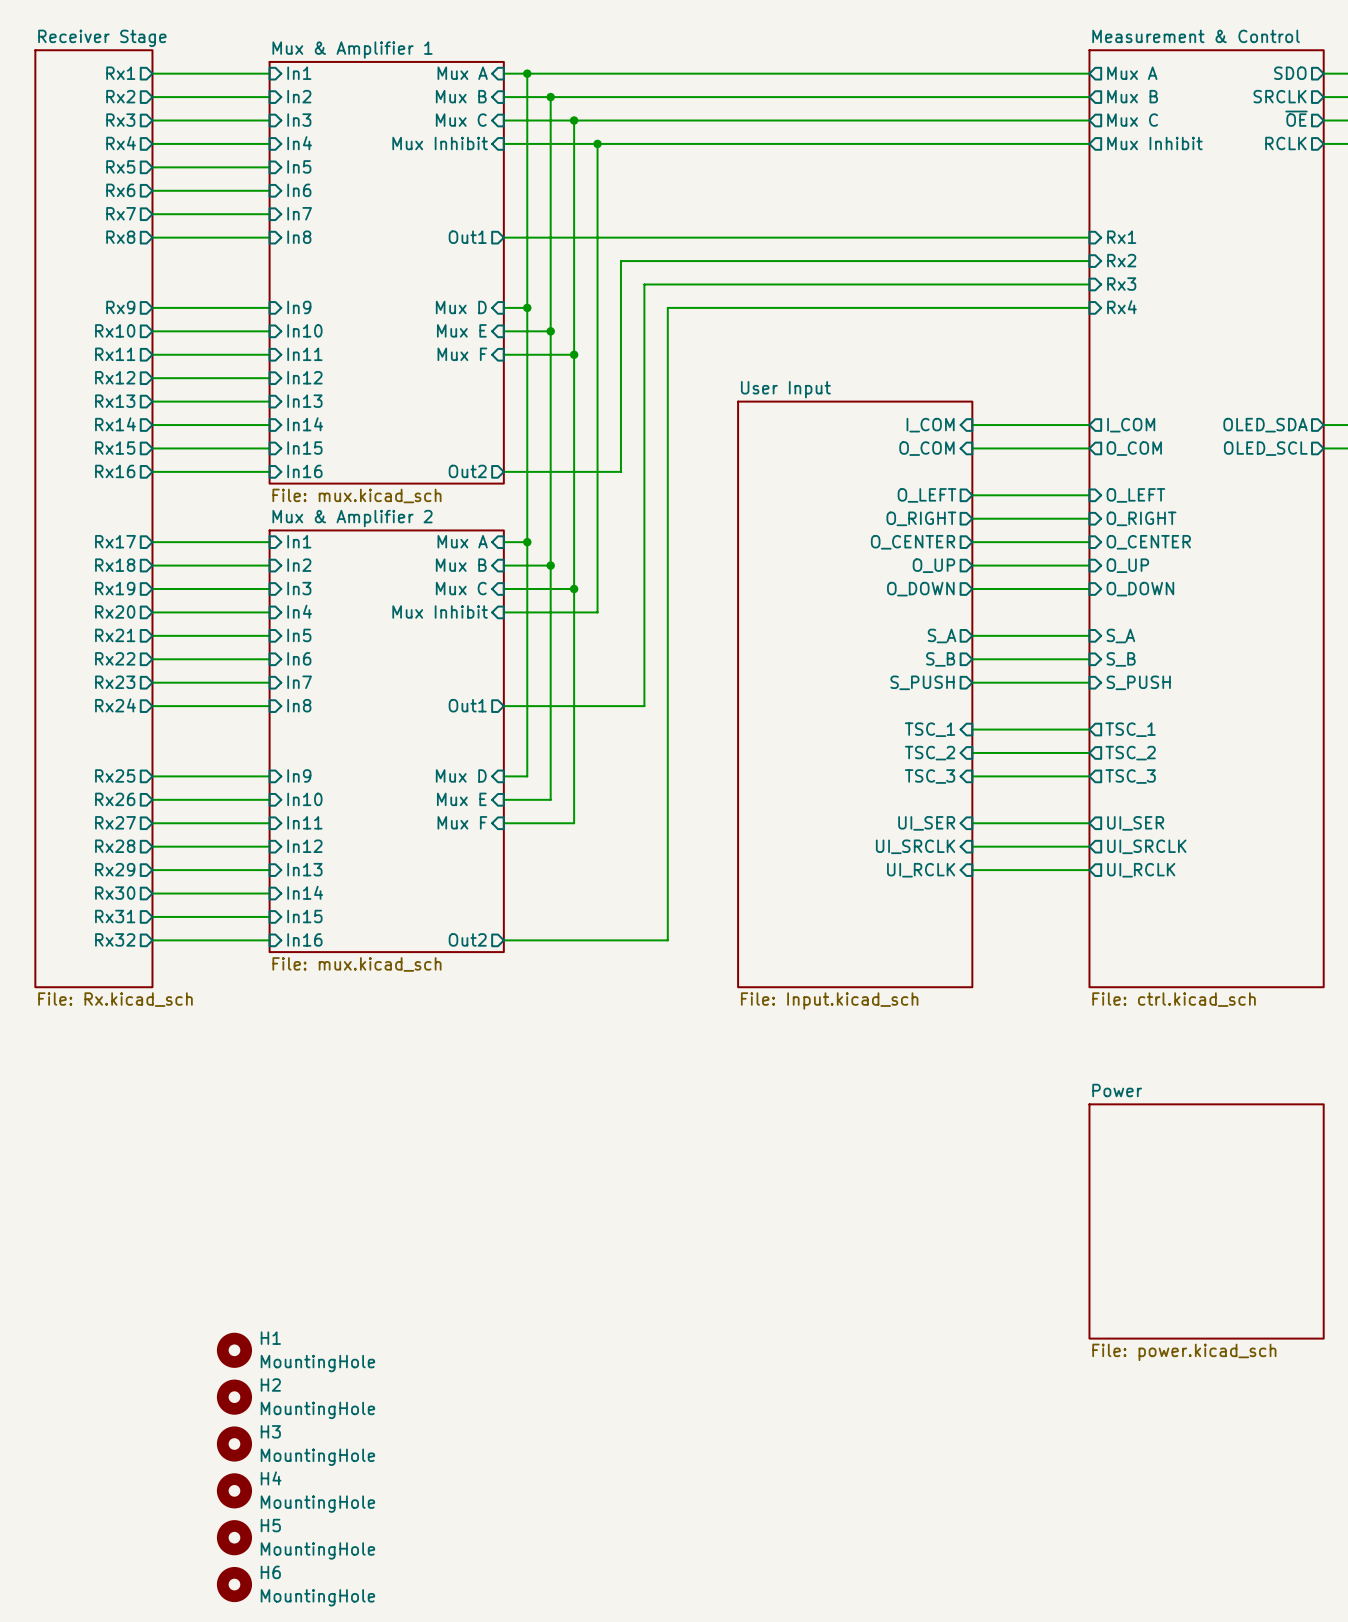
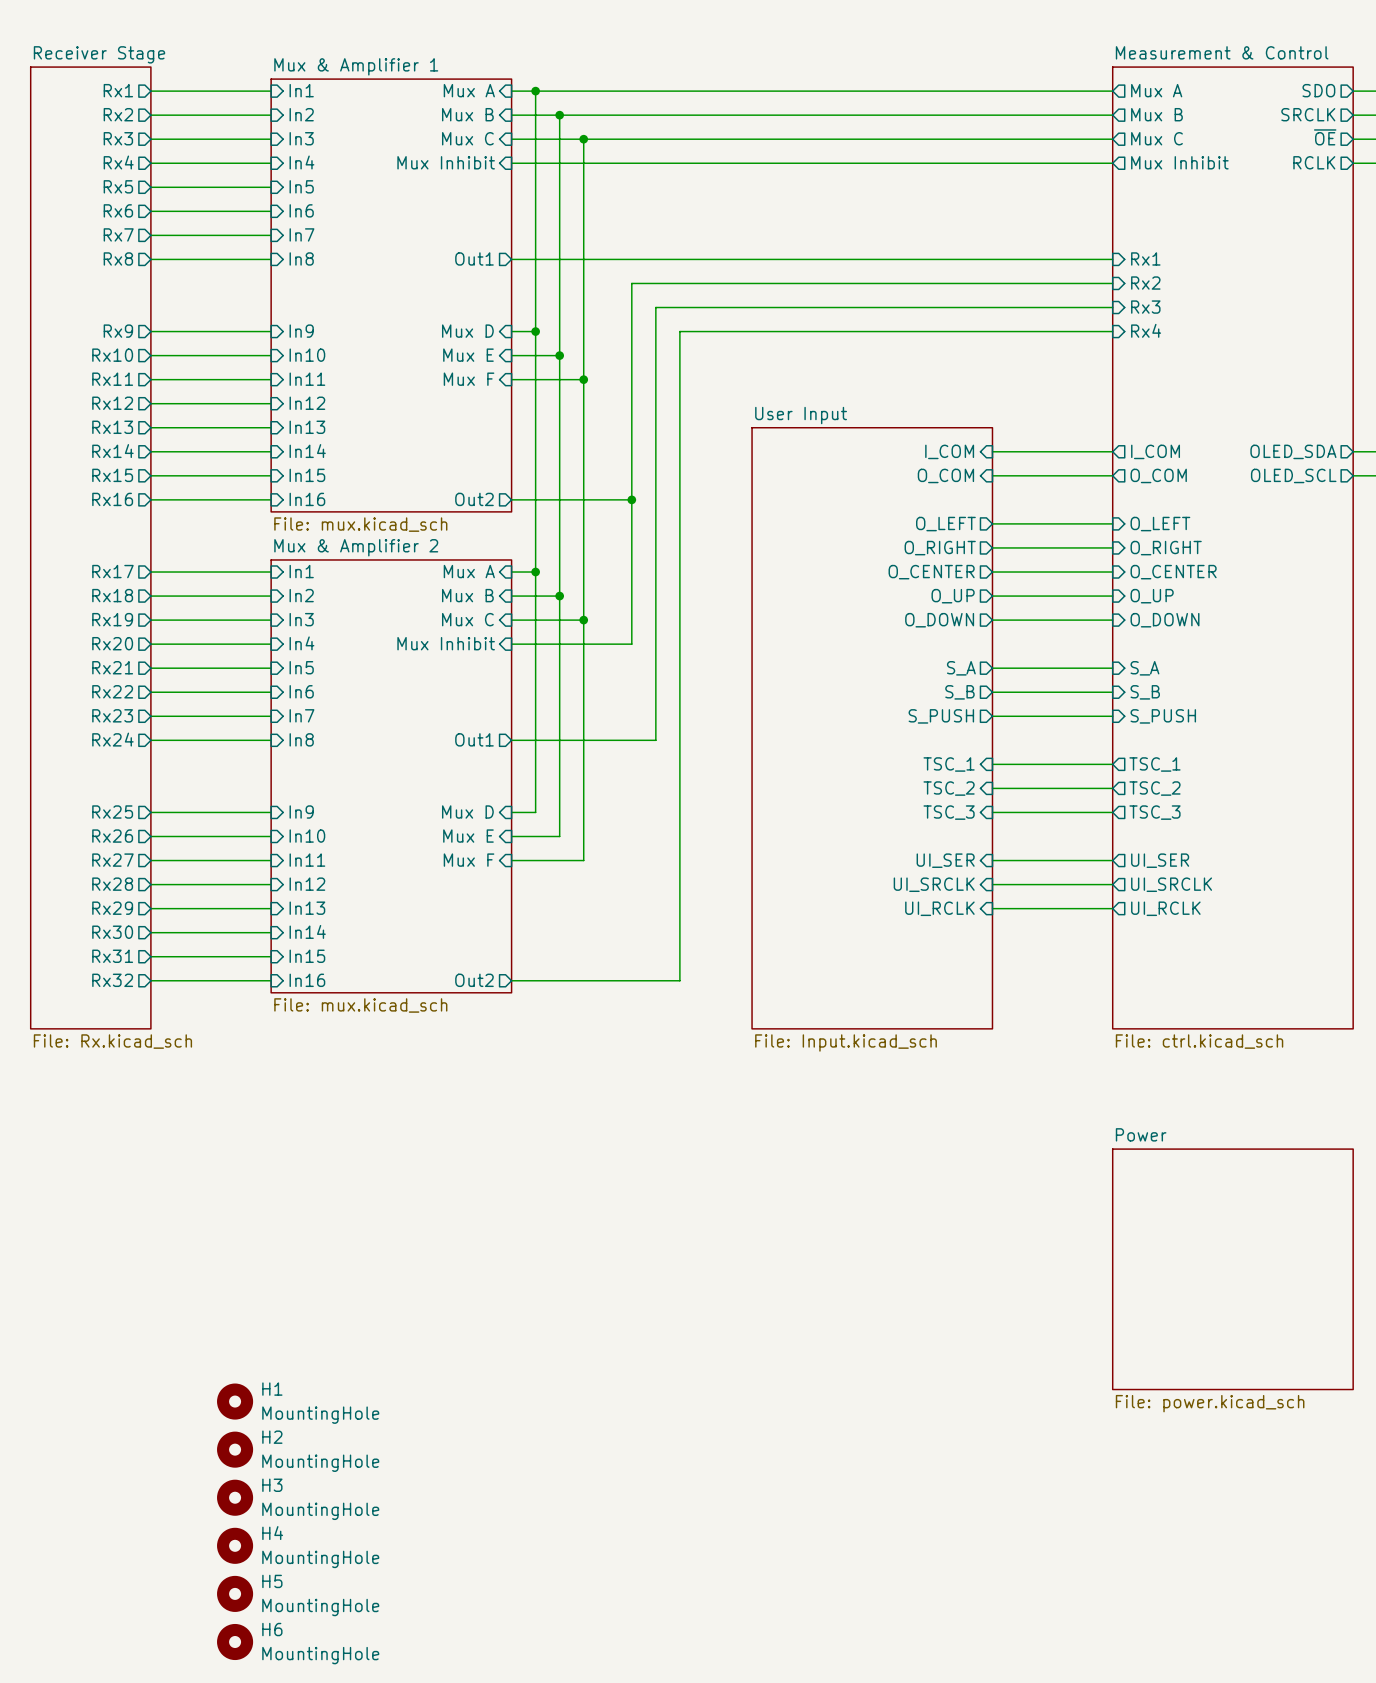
wire: (597, 143) (597, 612) -> (631, 499) (631, 644) (607, 644)
junction: (597, 143) -> none
junction: none -> (631, 499)

